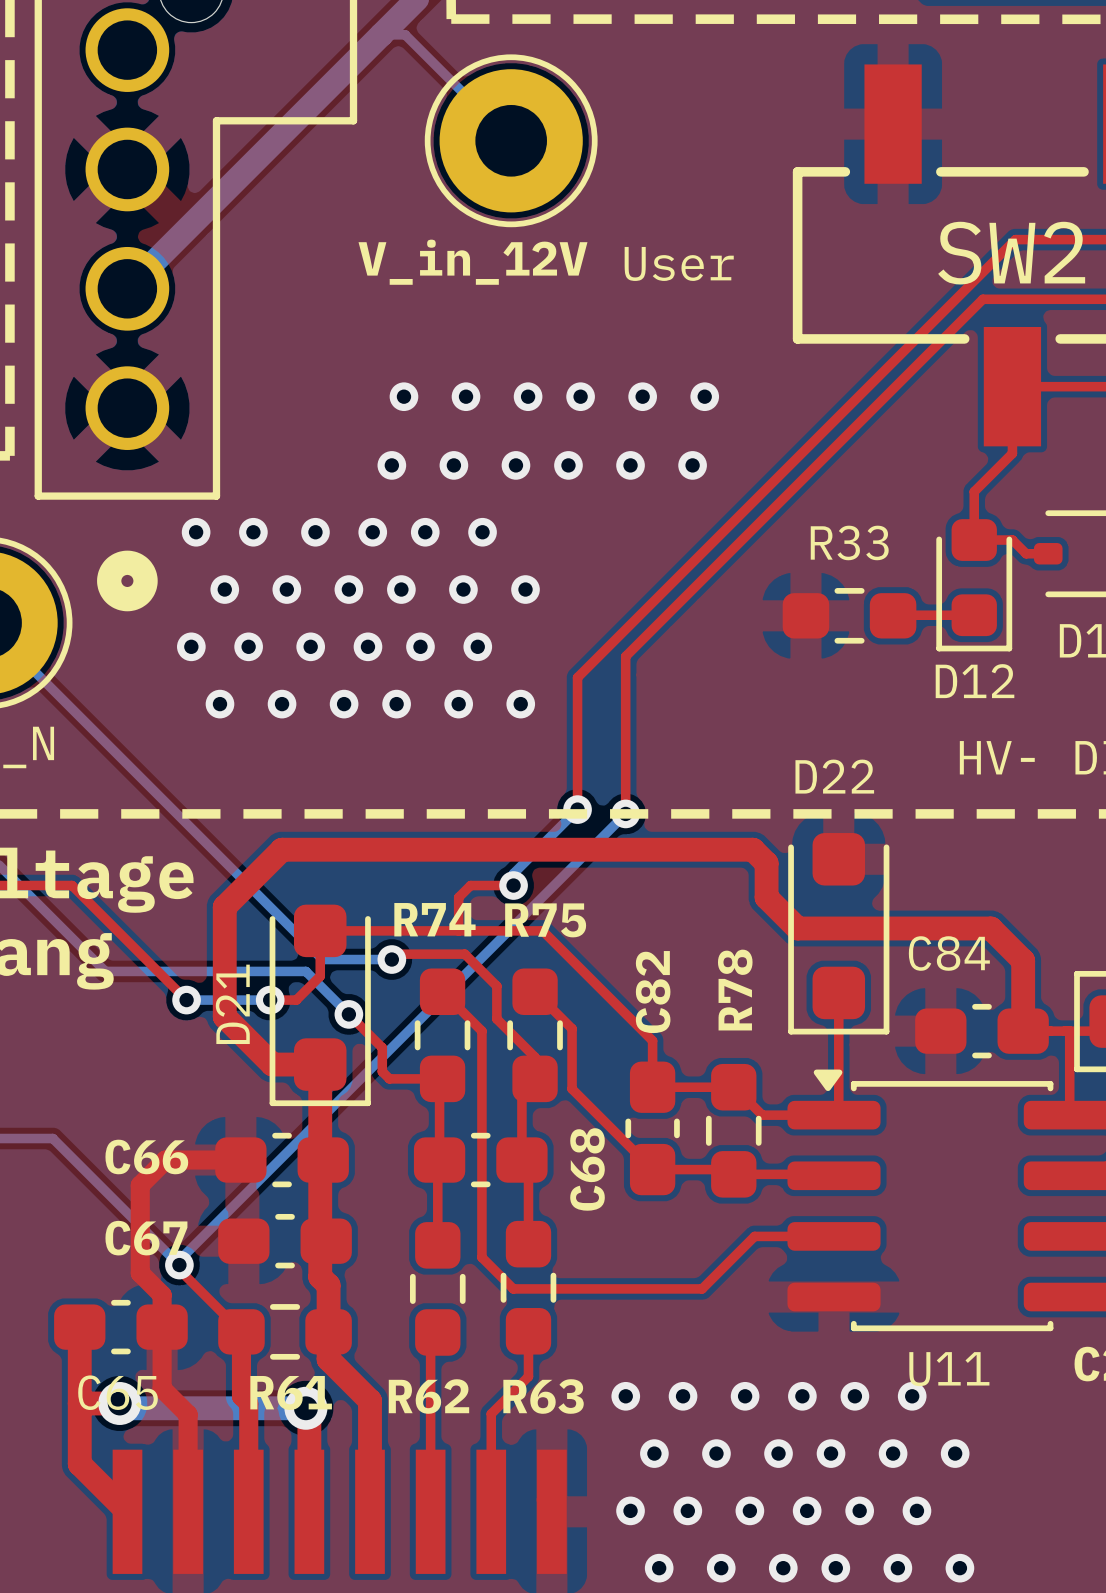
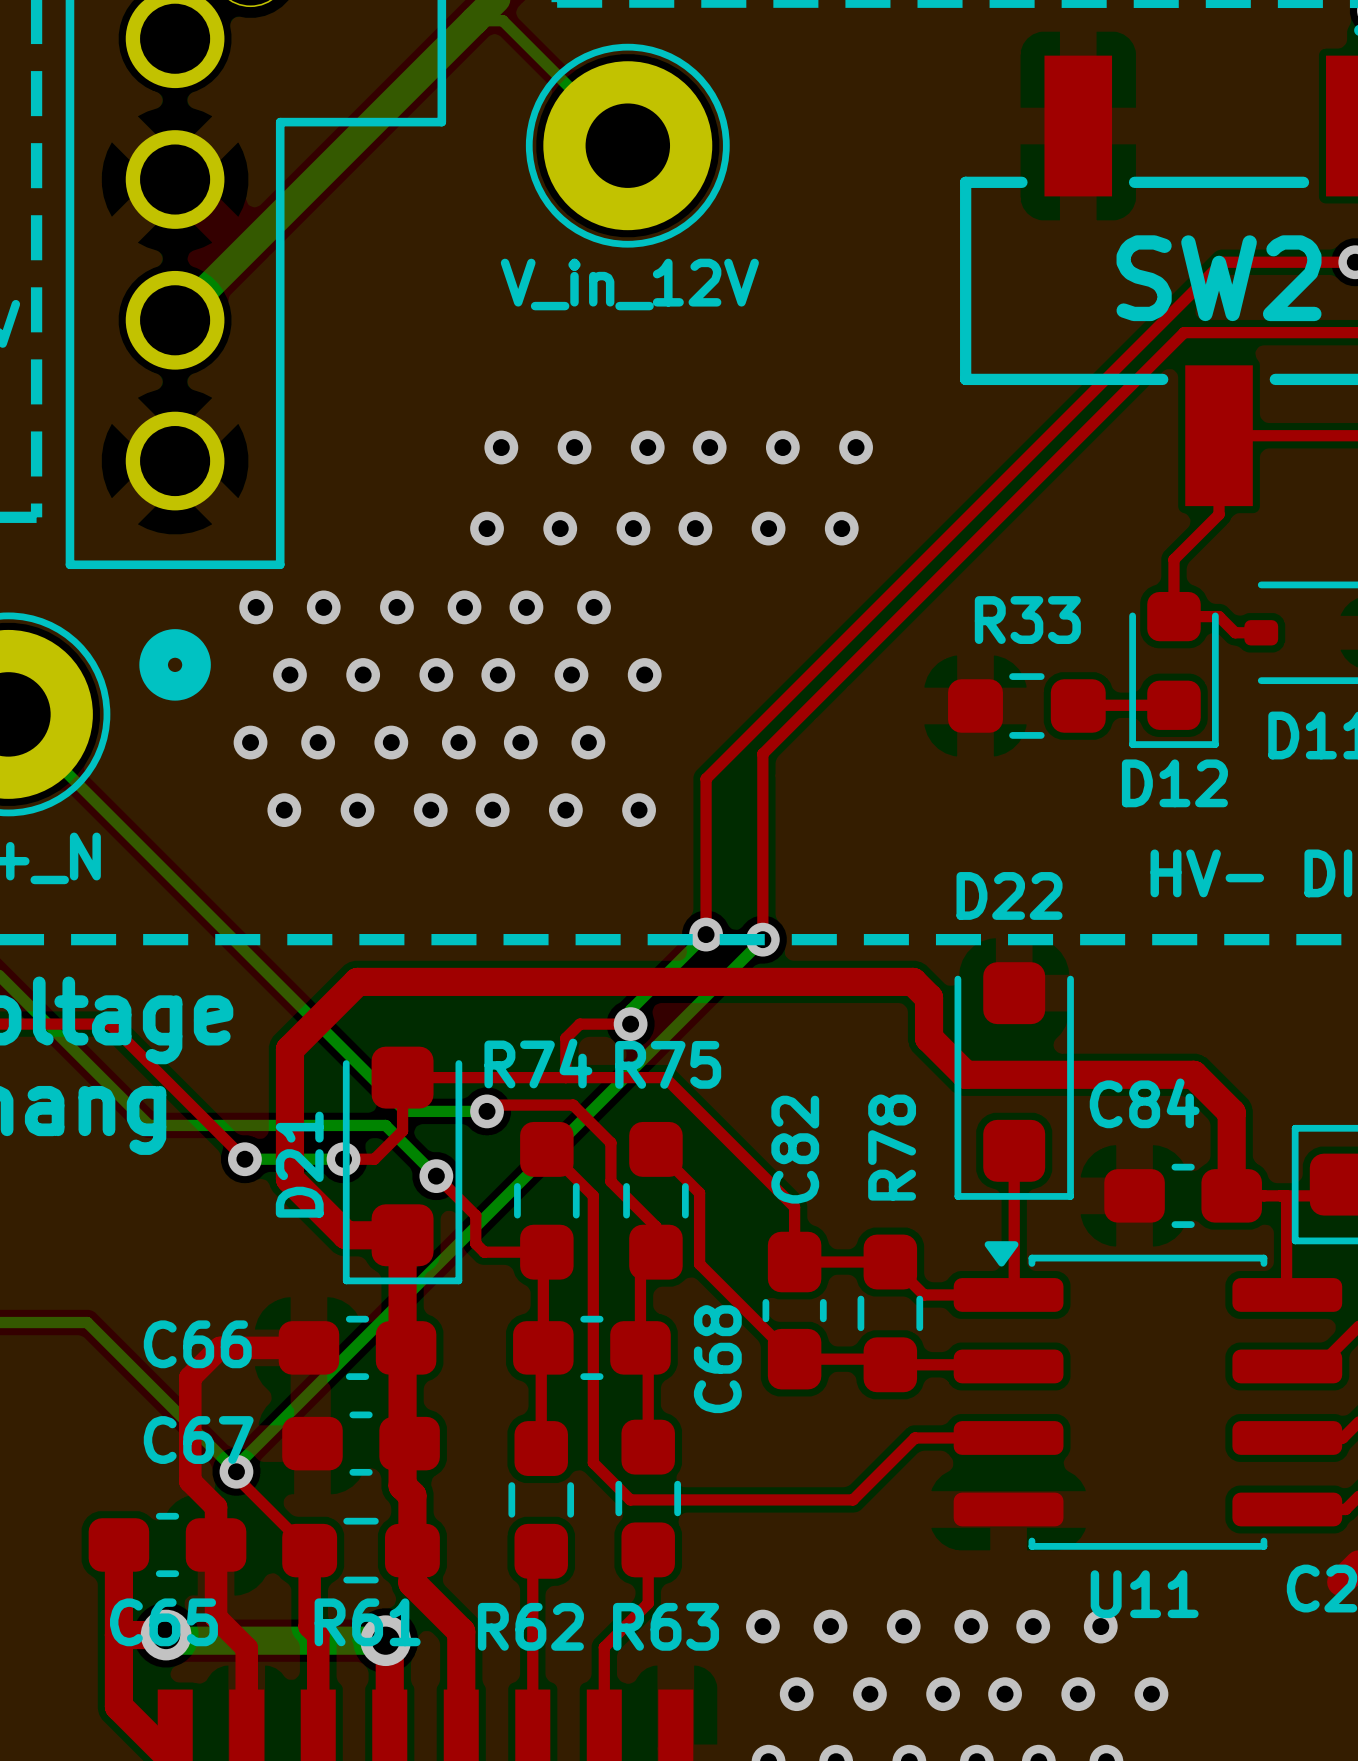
part value position: V_in_12V (472, 262) -> V_in_12V (629, 284)
text: User (679, 263) -> none

